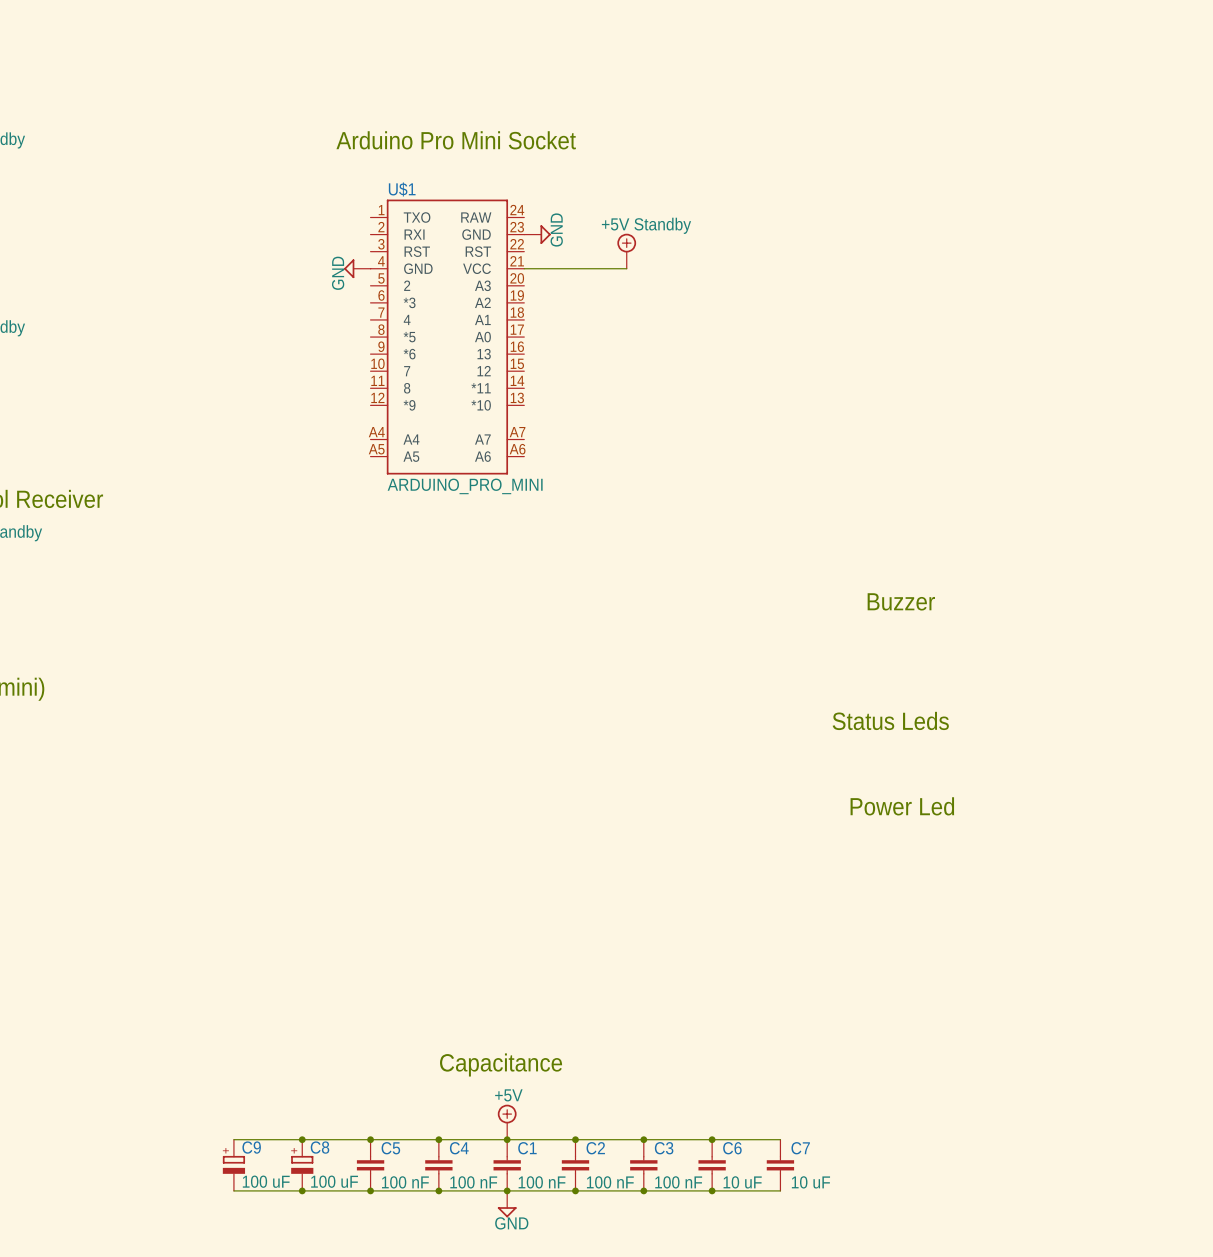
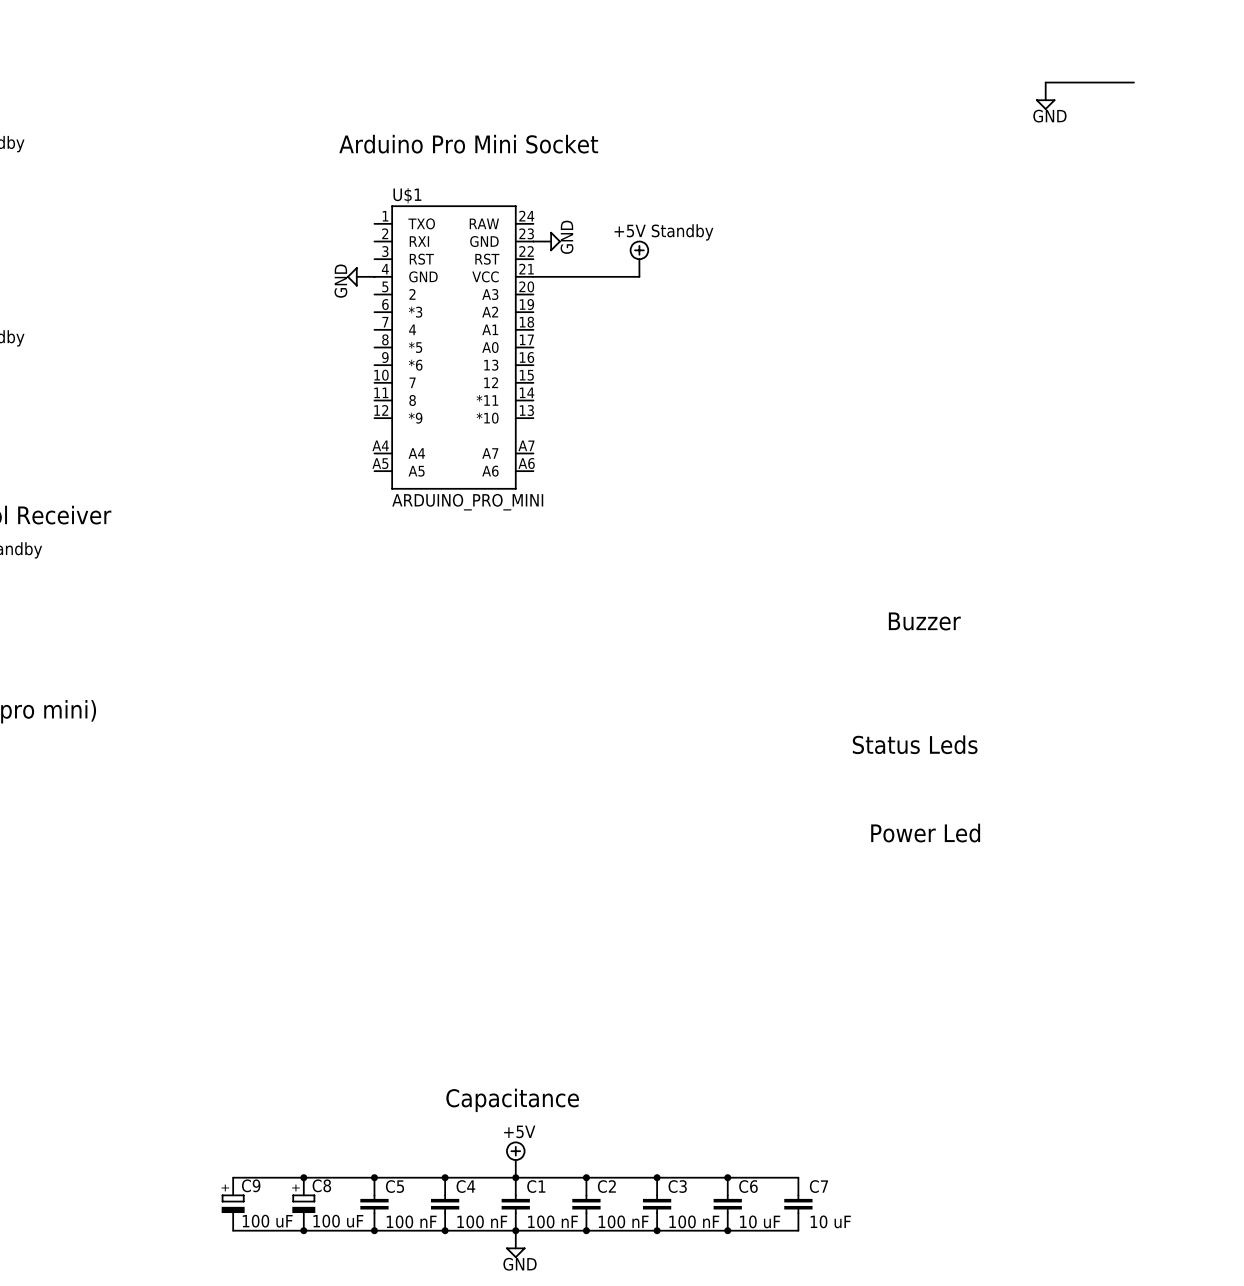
wire: none -> (1045, 82) (1134, 82)
power symbol: none -> GND (1045, 96)

